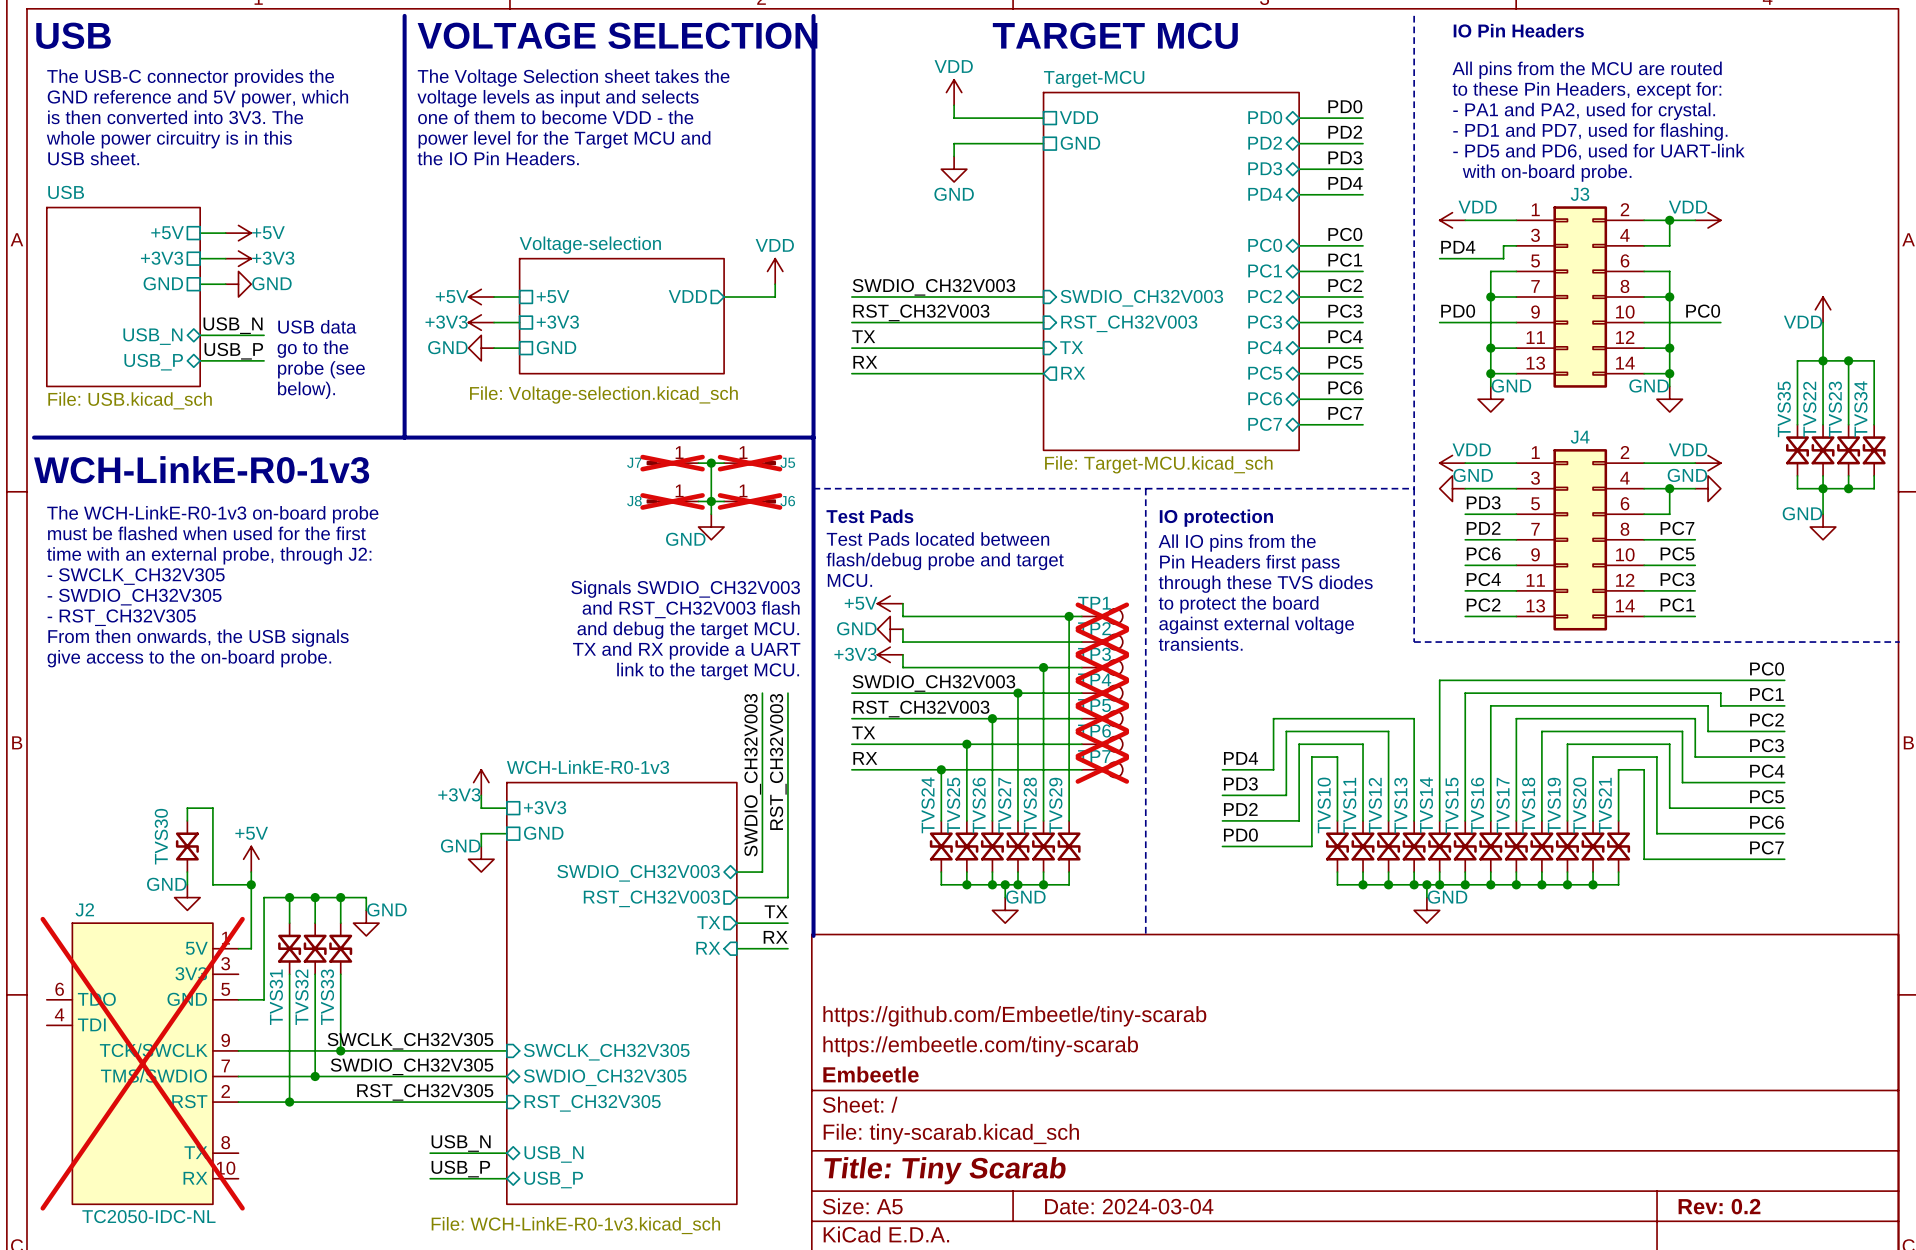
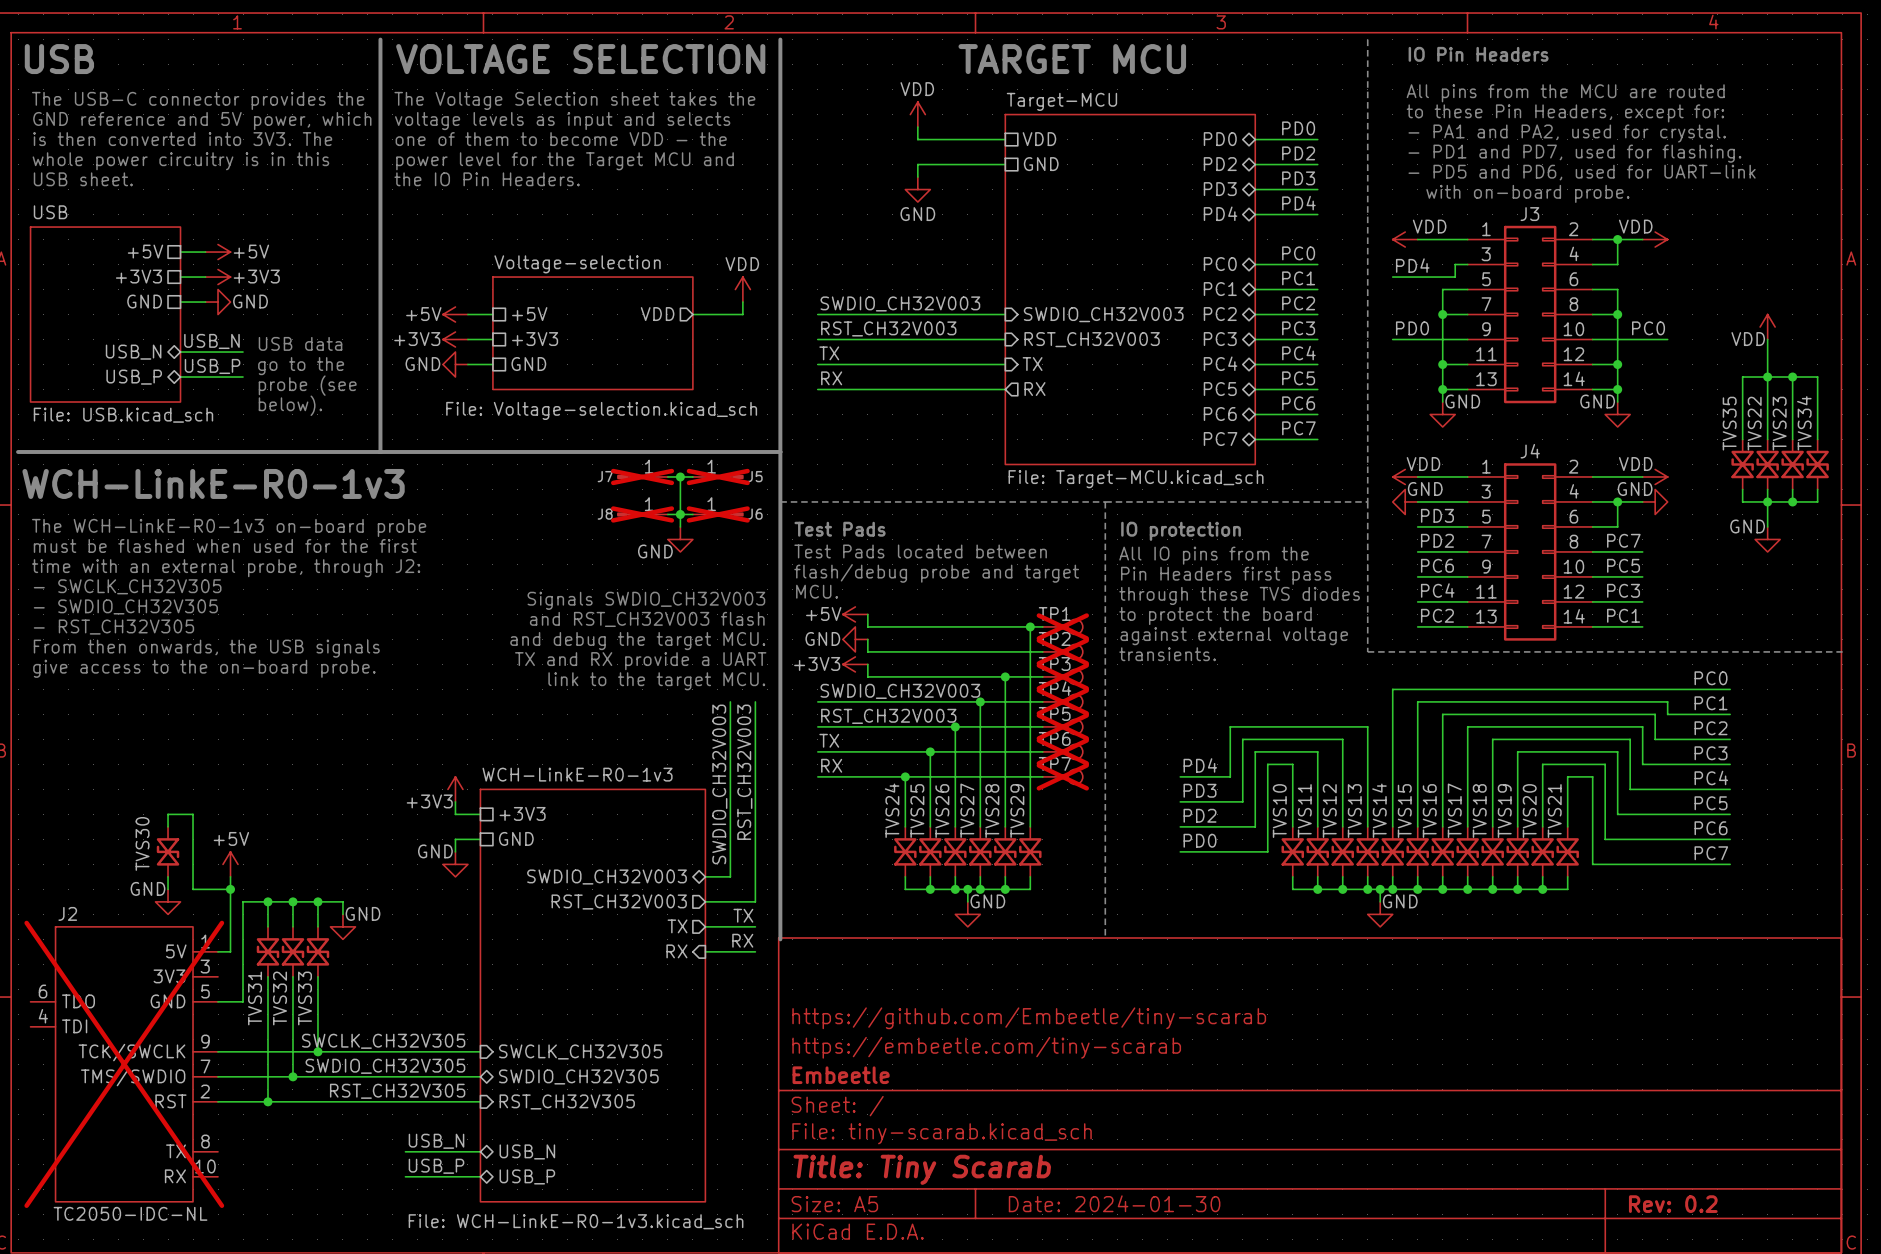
title block: Date: 2024-03-04 (1129, 1206) -> Date: 2024-01-30 (1114, 1203)

